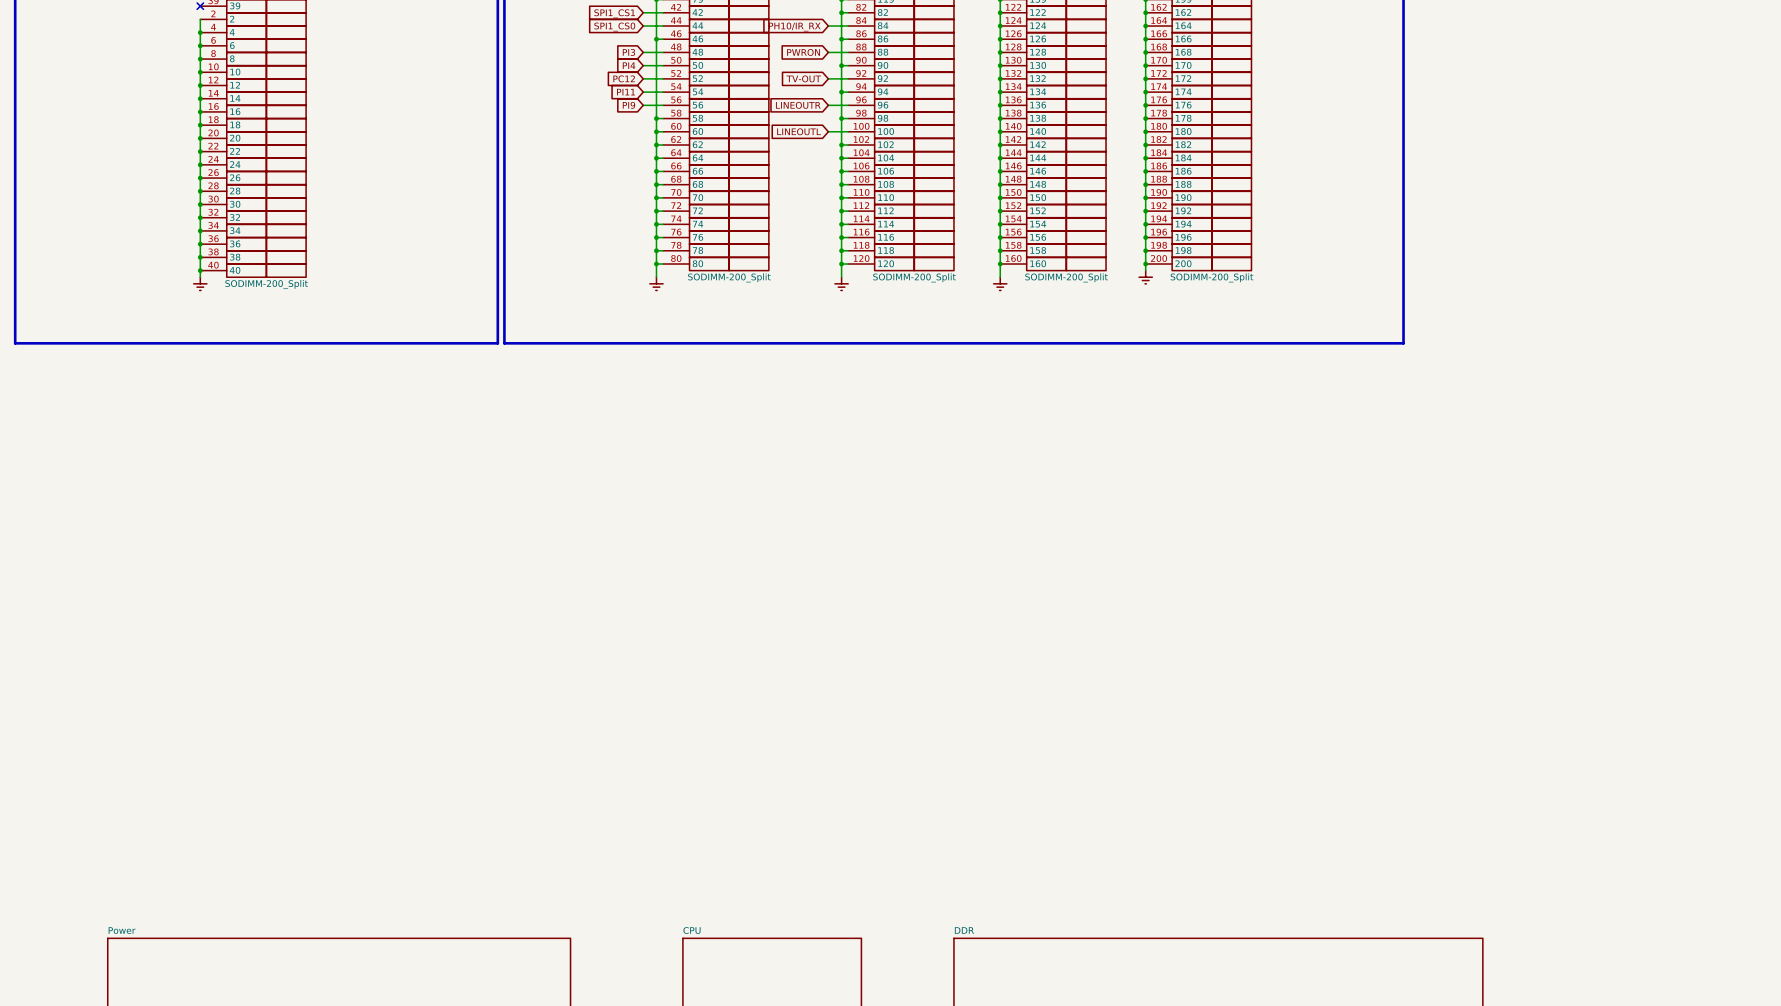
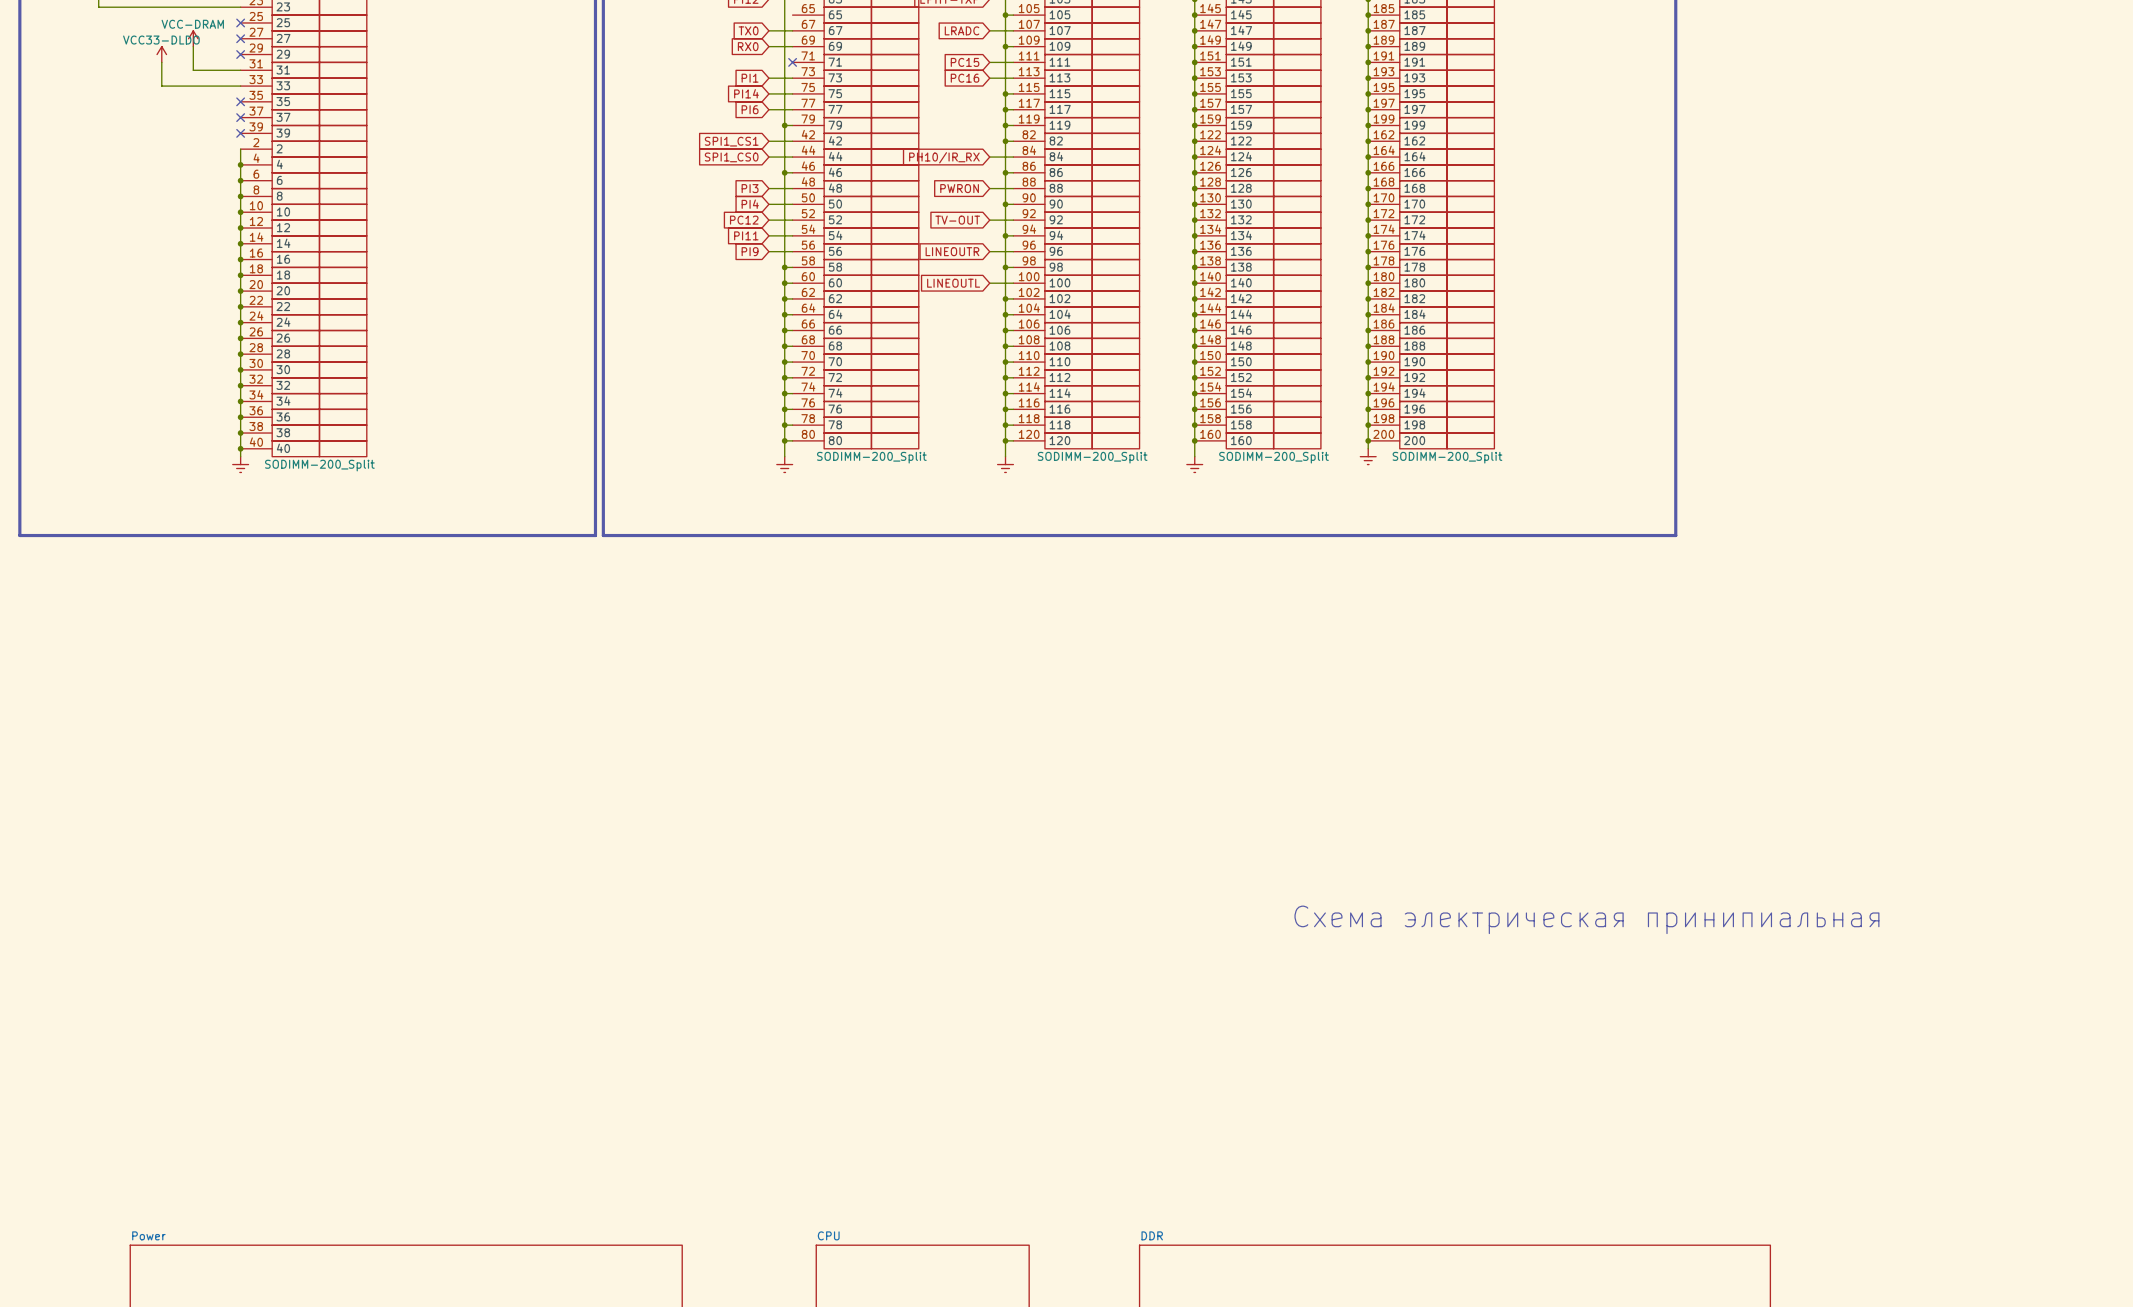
text: none -> Схема электрическая принипиальная (1586, 919)

